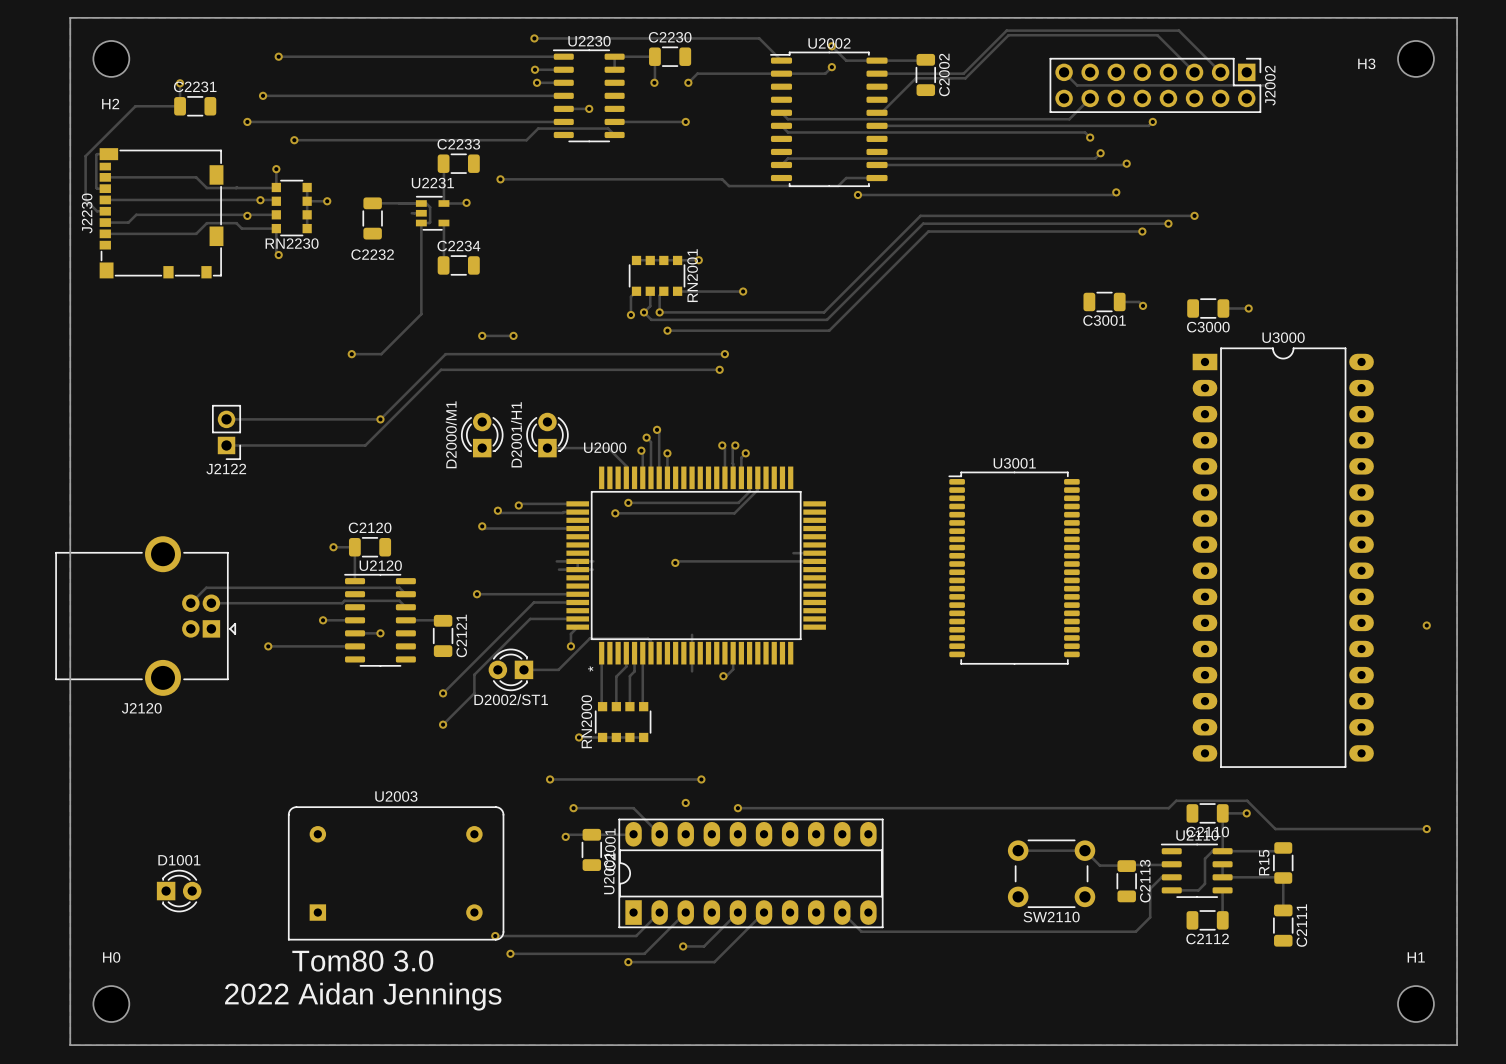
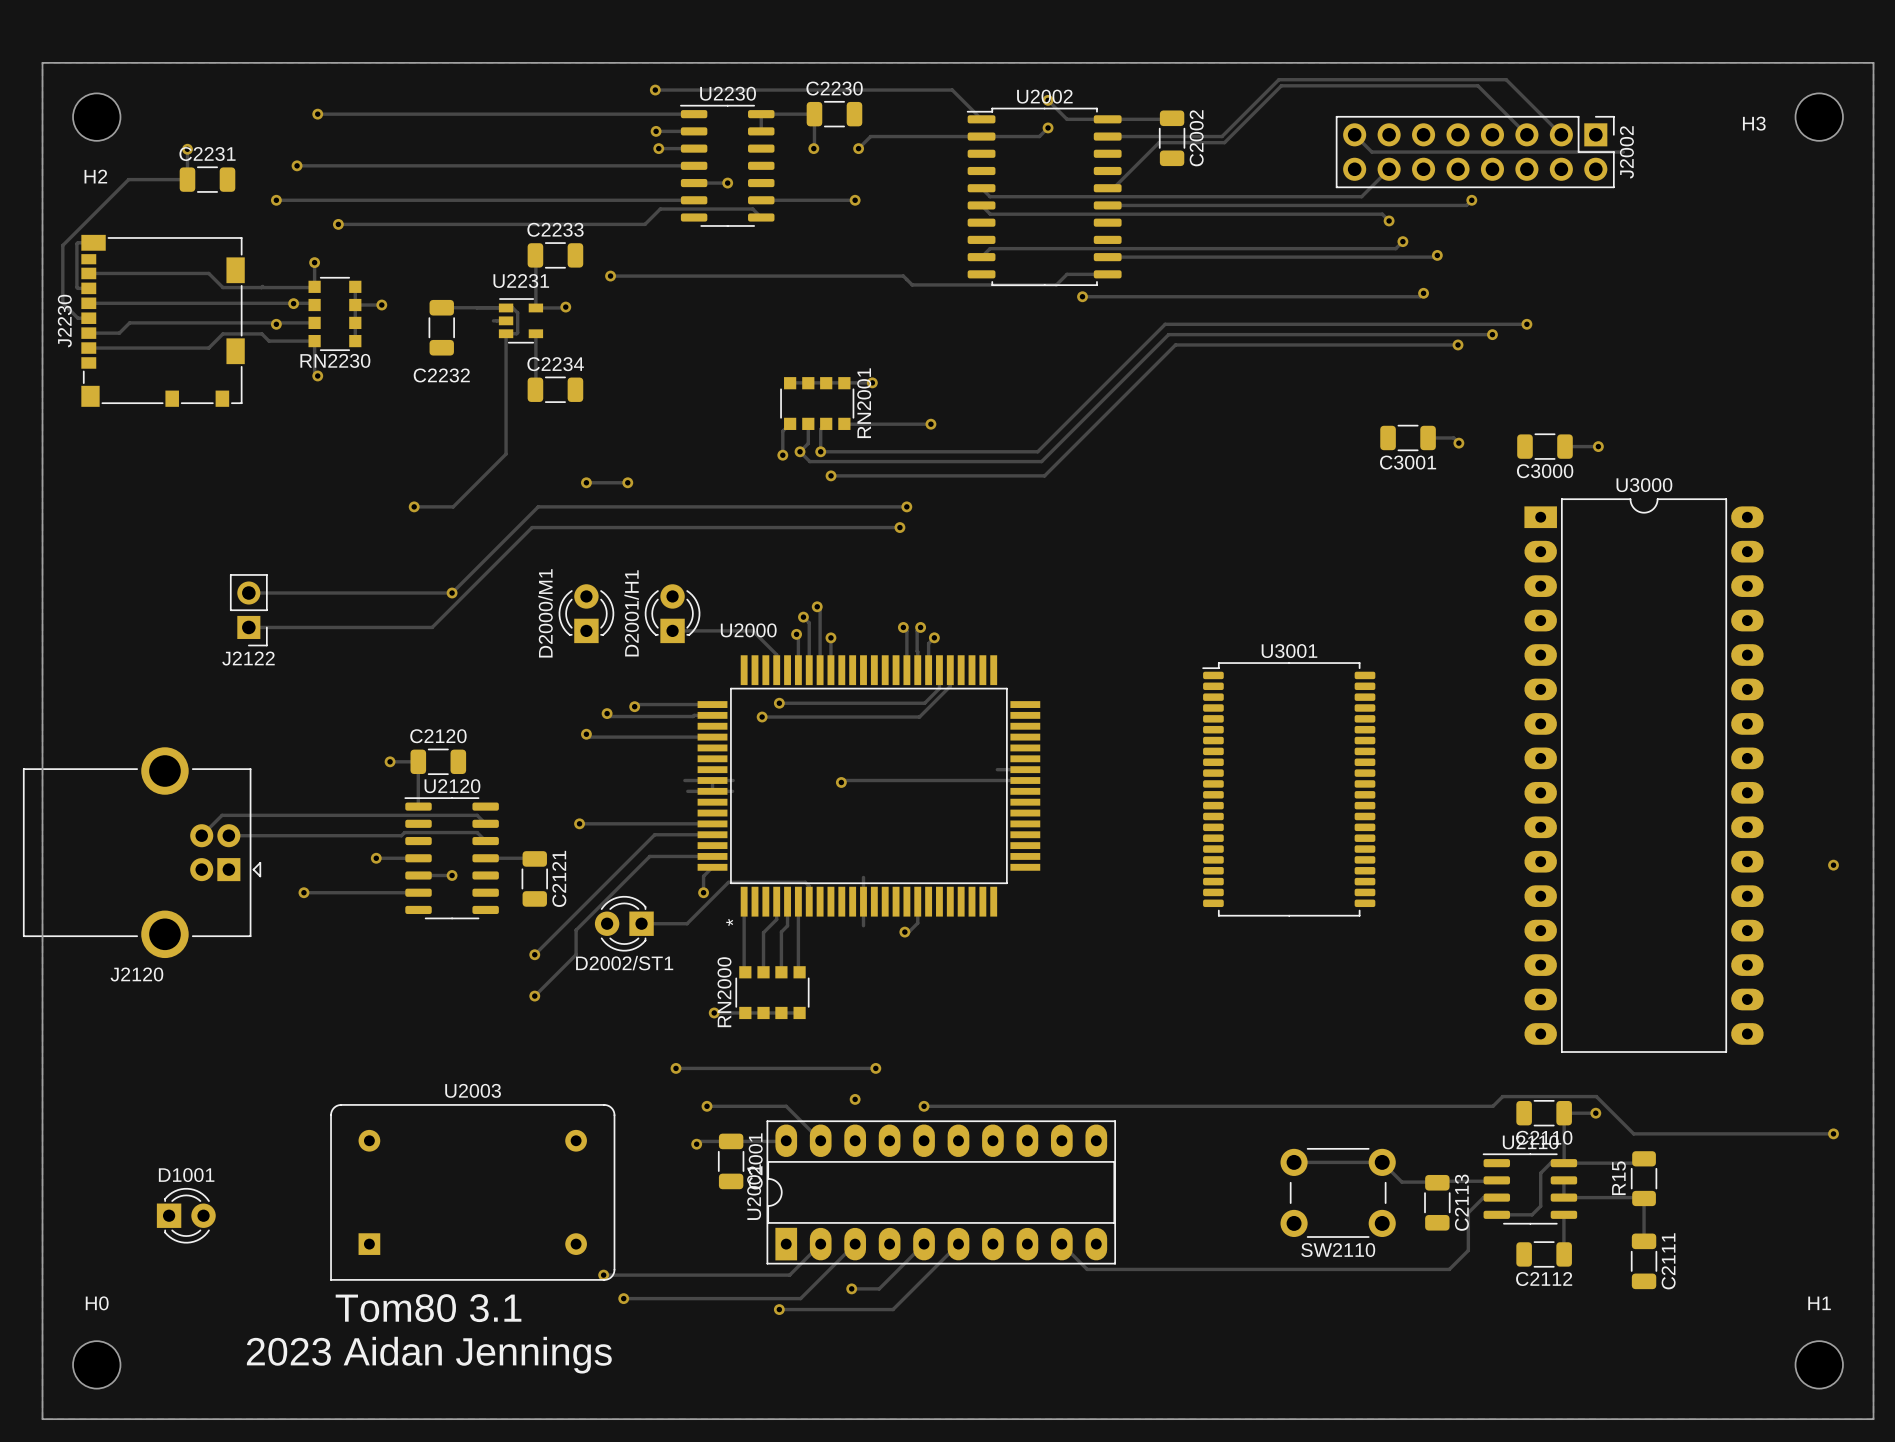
text: Tom80 3.0 (362, 961) -> Tom80 3.1 (428, 1308)
text: 2022 Aidan Jennings (363, 996) -> 2023 Aidan Jennings (429, 1355)

